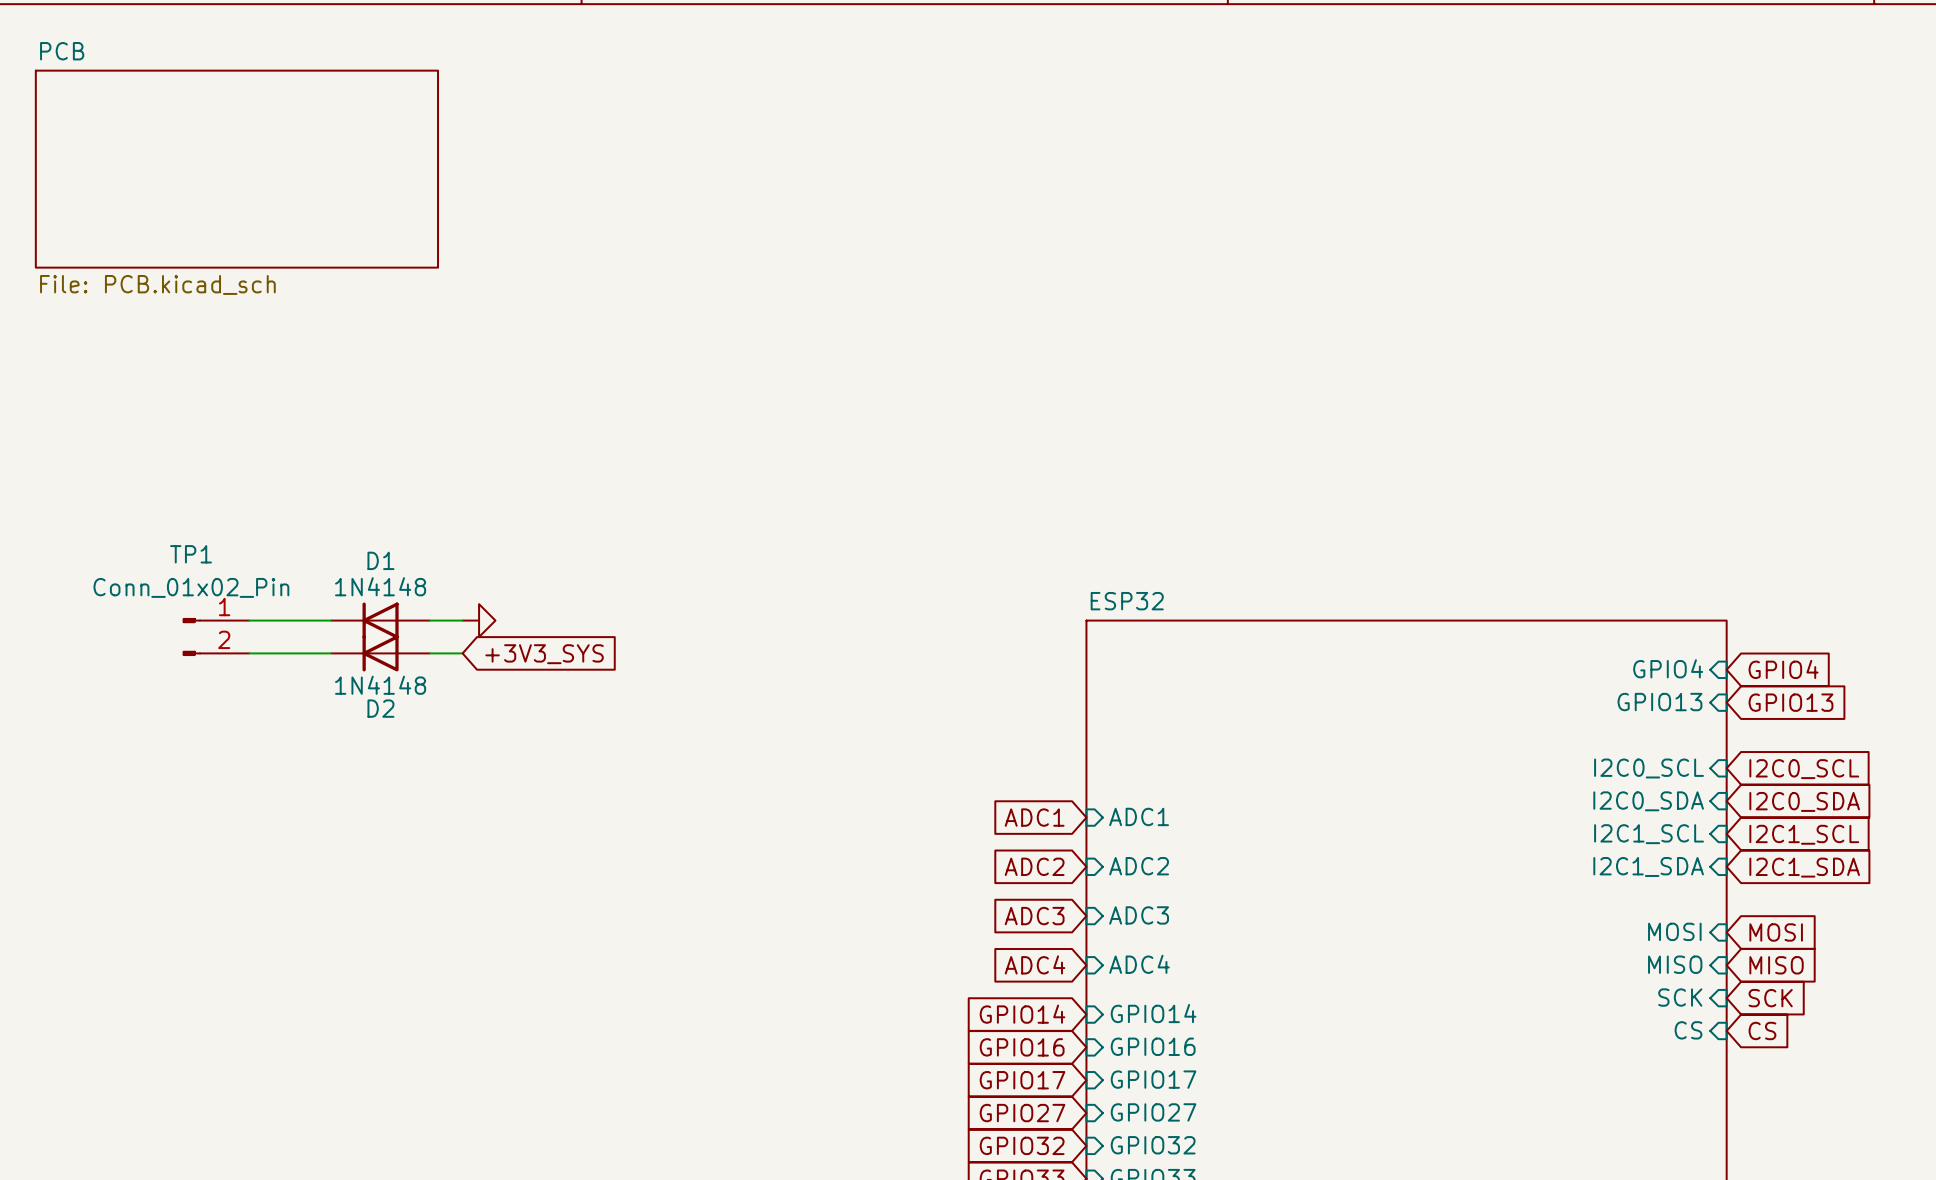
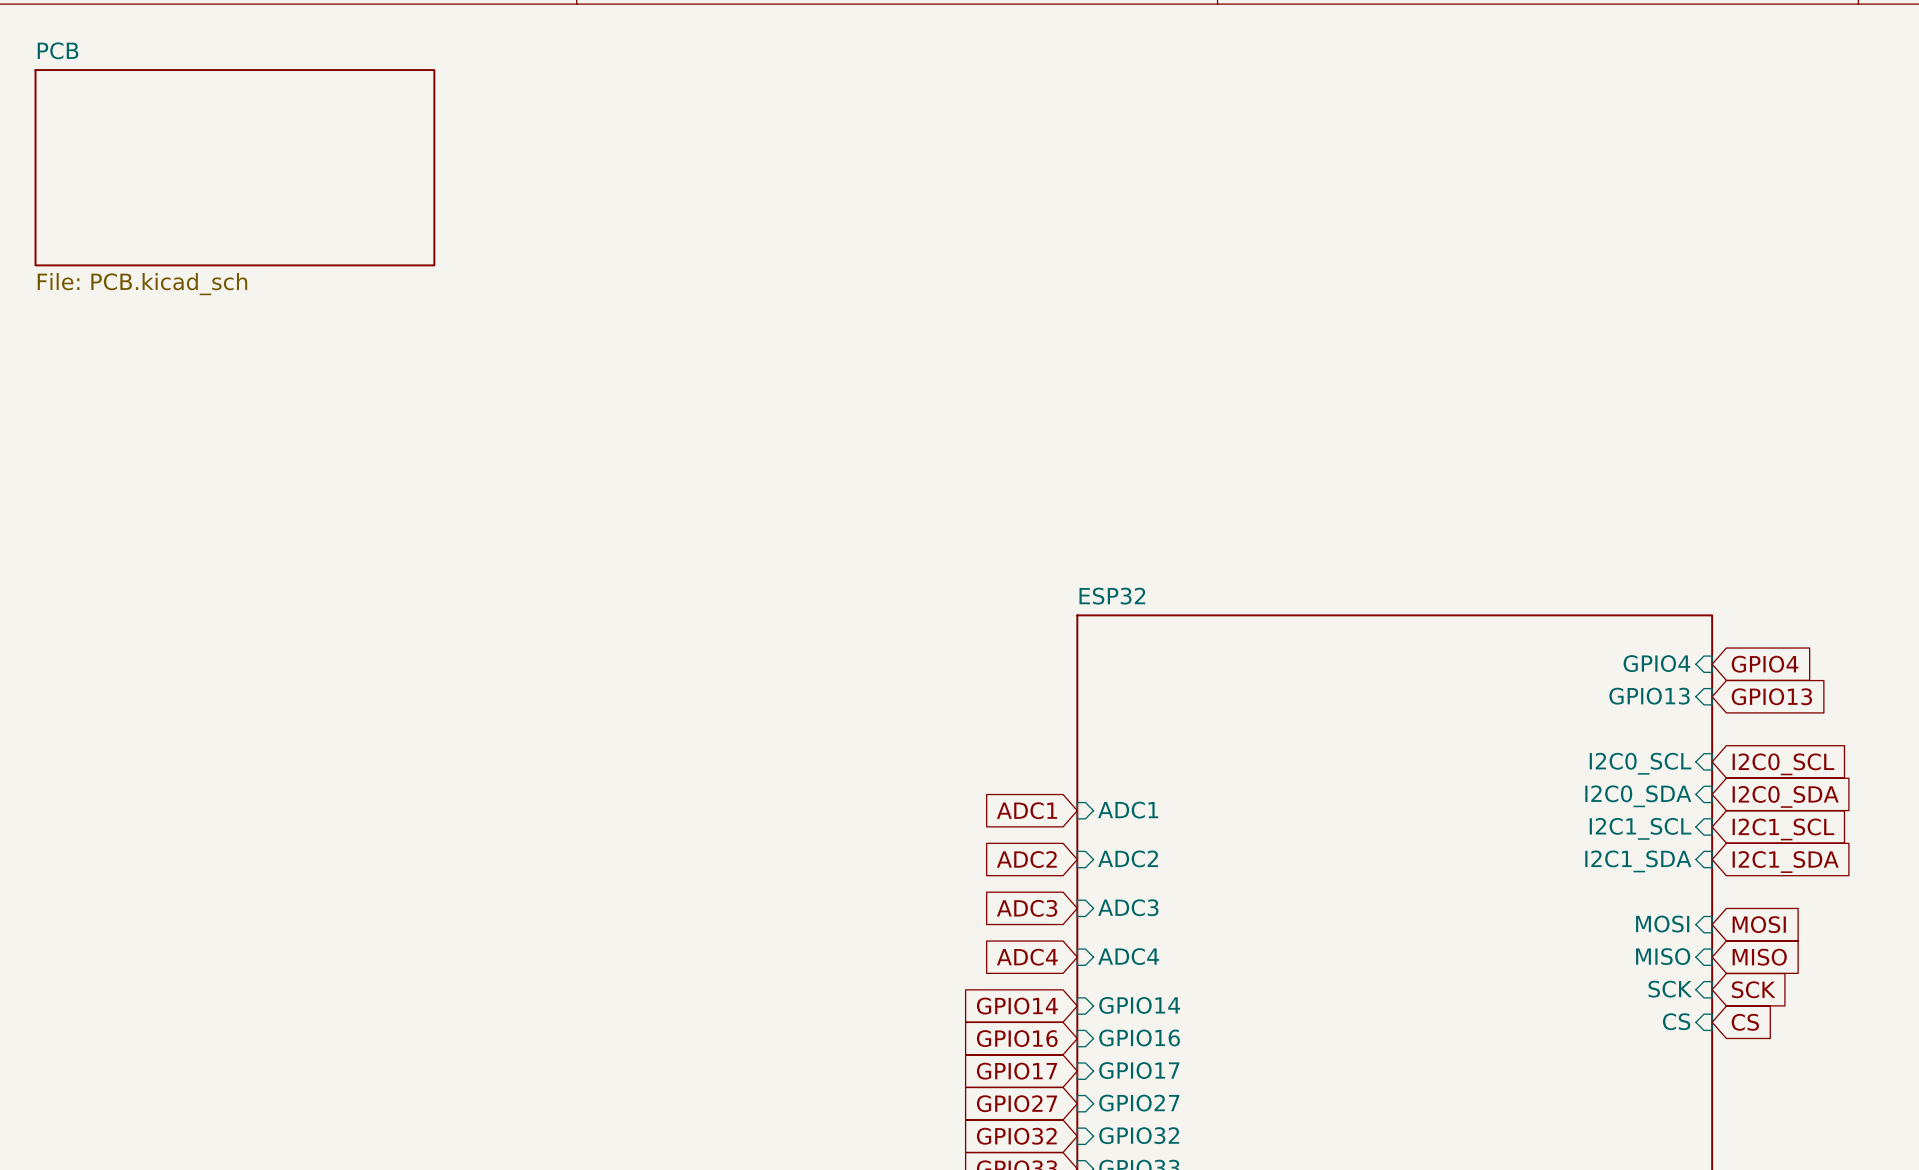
wire: (249, 620) (331, 620) -> none
D1: 1N4148 (380, 620) -> none
wire: (429, 620) (462, 620) -> none
power symbol: (479, 620) -> none
TP1: Conn_01x02_Pin (215, 636) -> none
wire: (249, 653) (331, 653) -> none
D2: 1N4148 (380, 653) -> none
wire: (429, 653) (462, 653) -> none
global label: +3V3_SYS (544, 654) -> none

